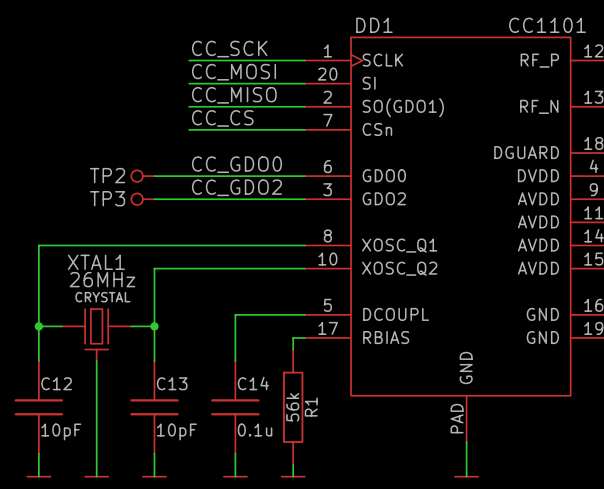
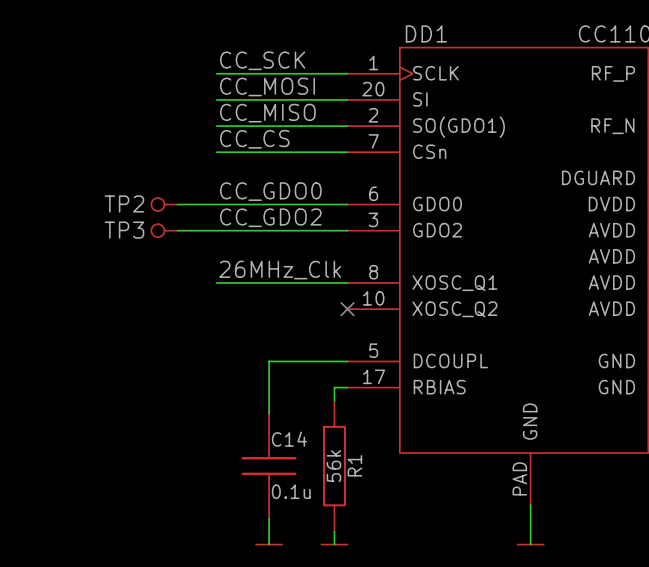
label: none -> 26MHz_Clk (280, 270)
wire: (189, 245) (38, 245) (38, 361) -> none
wire: (304, 268) (154, 268) (154, 361) -> none
no-connect mark: none -> (347, 309)
wire: (38, 326) (61, 326) -> none
junction: (38, 326) -> none
wire: (131, 326) (154, 326) -> none
junction: (154, 326) -> none
XTAL1: 26MHz (96, 335) -> none
wire: (96, 361) (96, 476) -> none
C12: 10pF (38, 407) -> none
C13: 10pF (154, 407) -> none
wire: (38, 453) (38, 476) -> none
wire: (154, 453) (154, 476) -> none
power symbol: (38, 476) -> none
power symbol: (96, 476) -> none
power symbol: (154, 476) -> none

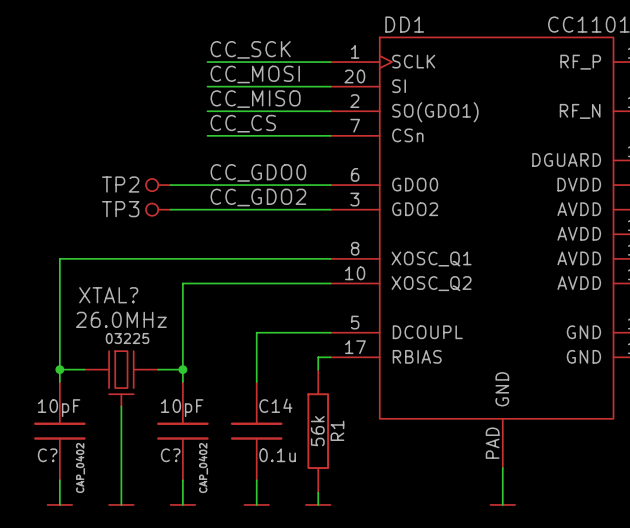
label: 26MHz_Clk (280, 270) -> none
wire: none -> (207, 258) (59, 258) (59, 381)
wire: none -> (330, 283) (182, 283) (182, 381)
no-connect mark: (347, 309) -> none
wire: none -> (59, 369) (84, 369)
junction: none -> (59, 369)
wire: none -> (158, 369) (182, 369)
junction: none -> (182, 369)
XTAL?: none -> 26.0MHz (121, 378)
wire: none -> (121, 406) (121, 504)
C?: none -> 10pF (59, 431)
C?: none -> 10pF (182, 431)
wire: none -> (59, 480) (59, 504)
wire: none -> (182, 480) (182, 504)
power symbol: none -> (59, 504)
power symbol: none -> (121, 504)
power symbol: none -> (182, 504)

